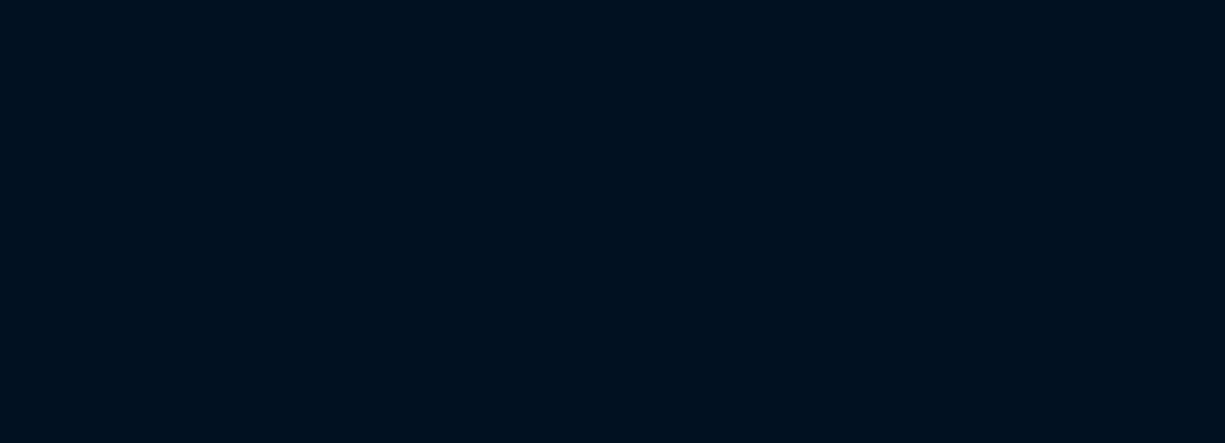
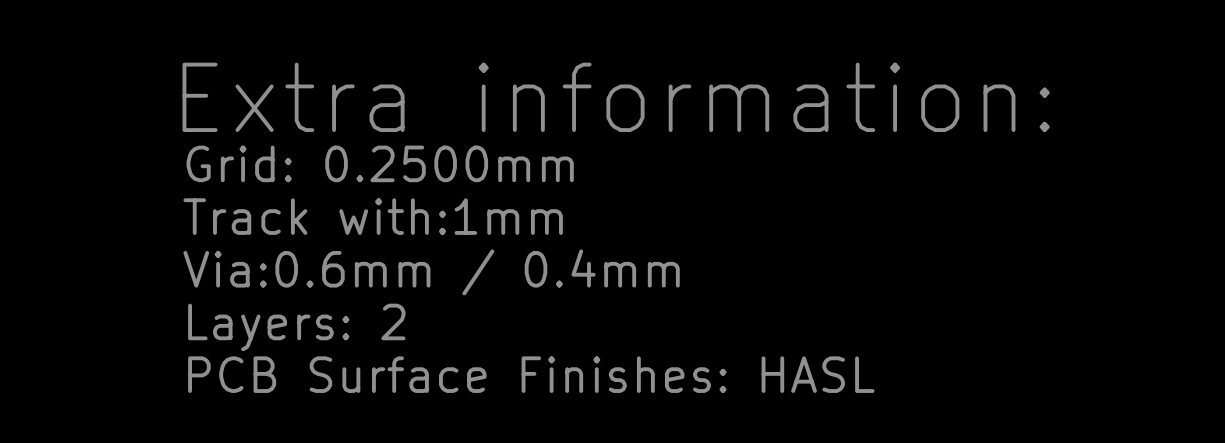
text: none -> Extra information: (616, 97)
text: none -> Grid: 0.2500mm (380, 163)
text: none -> Track with:1mm (373, 216)
text: none -> Via:0.6mm / 0.4mm (431, 272)
text: none -> Layers: 2 (296, 327)
text: none -> PCB Surface Finishes: HASL (531, 374)

